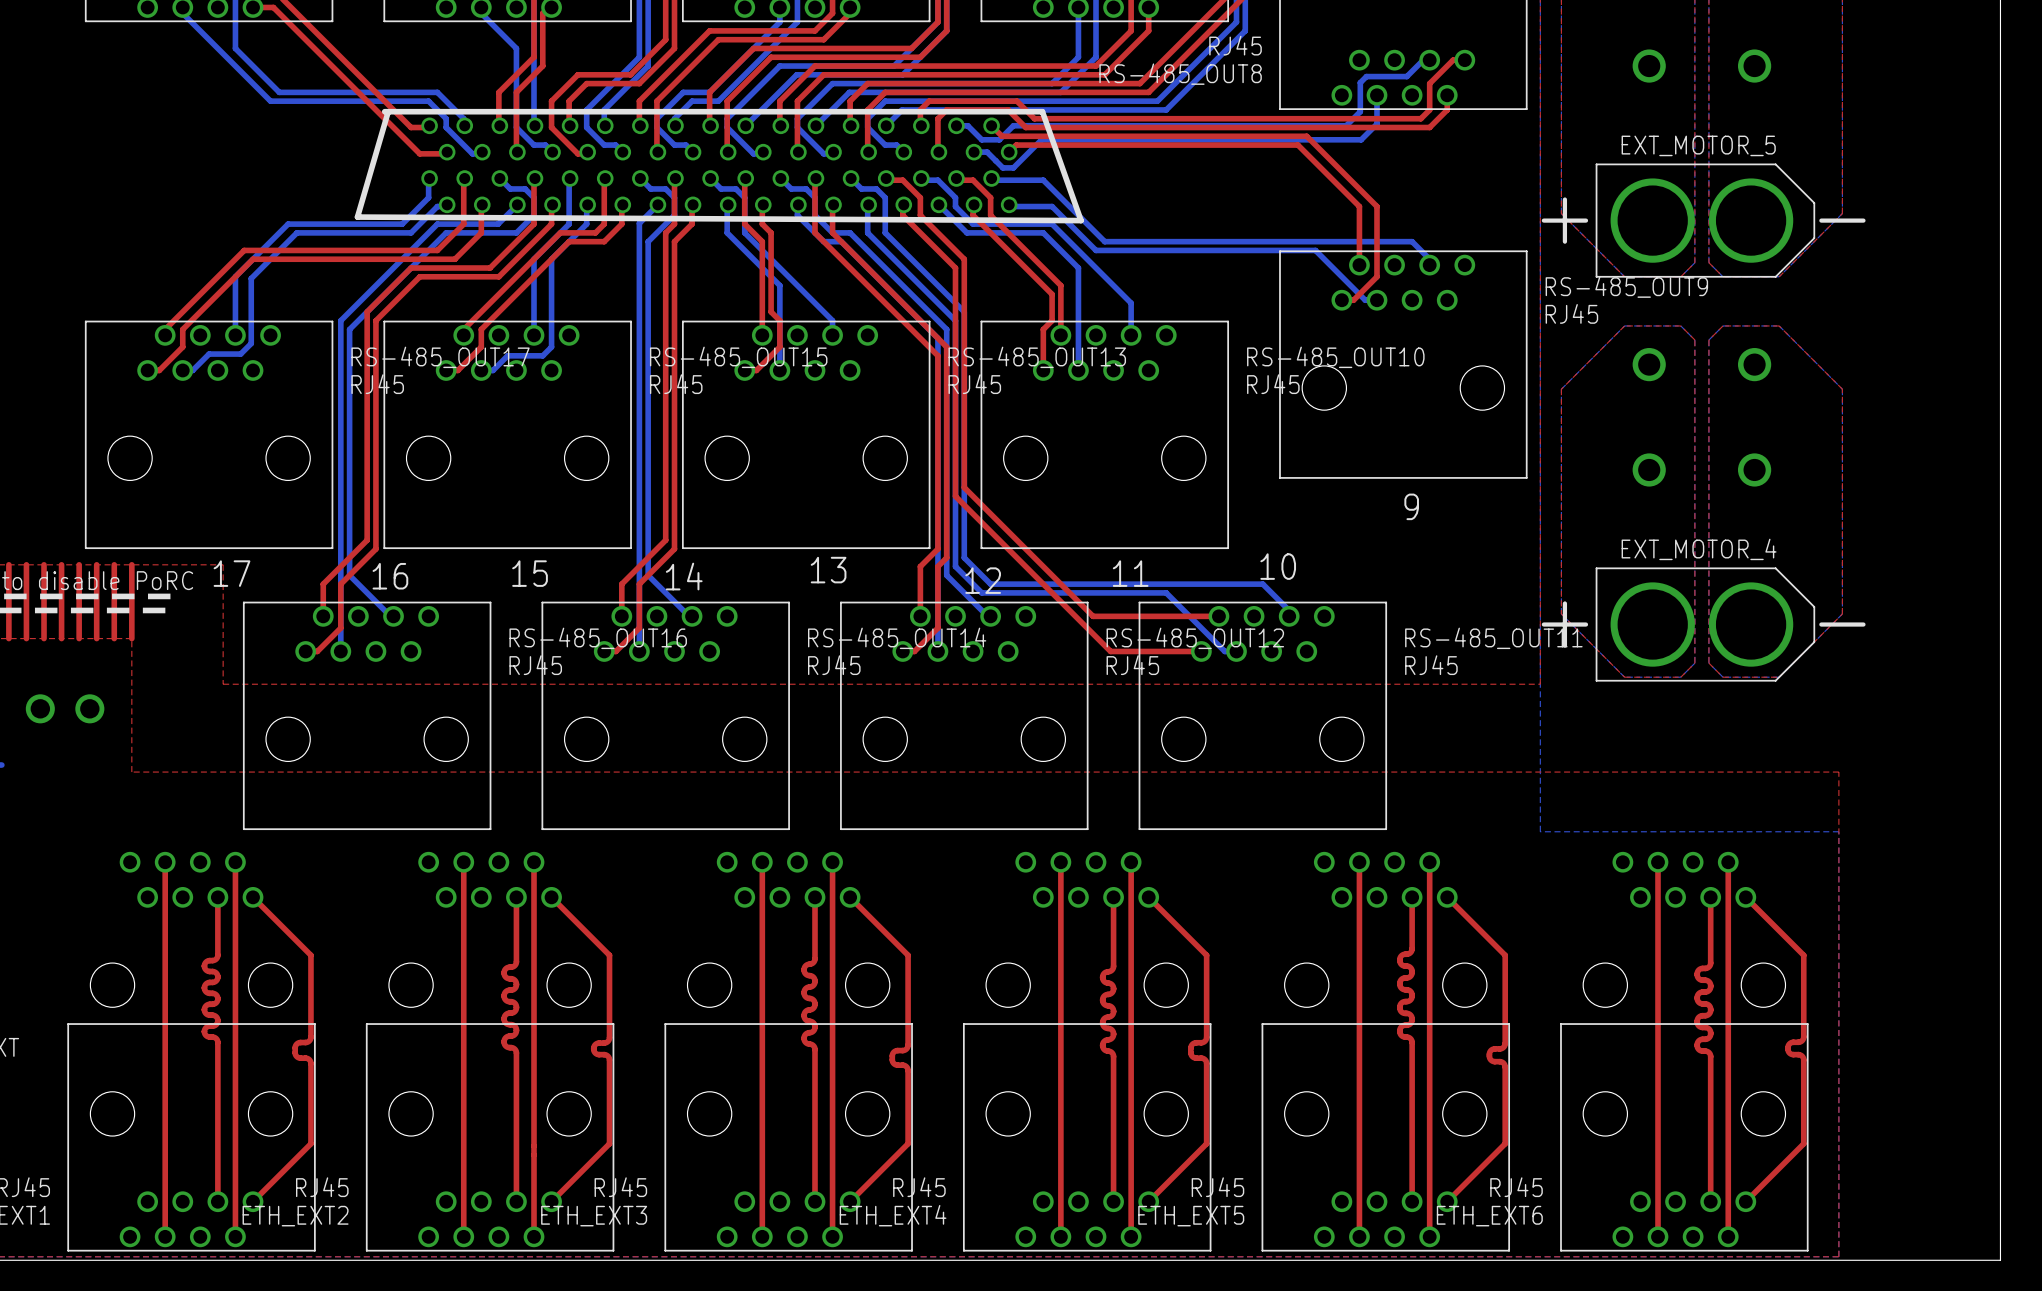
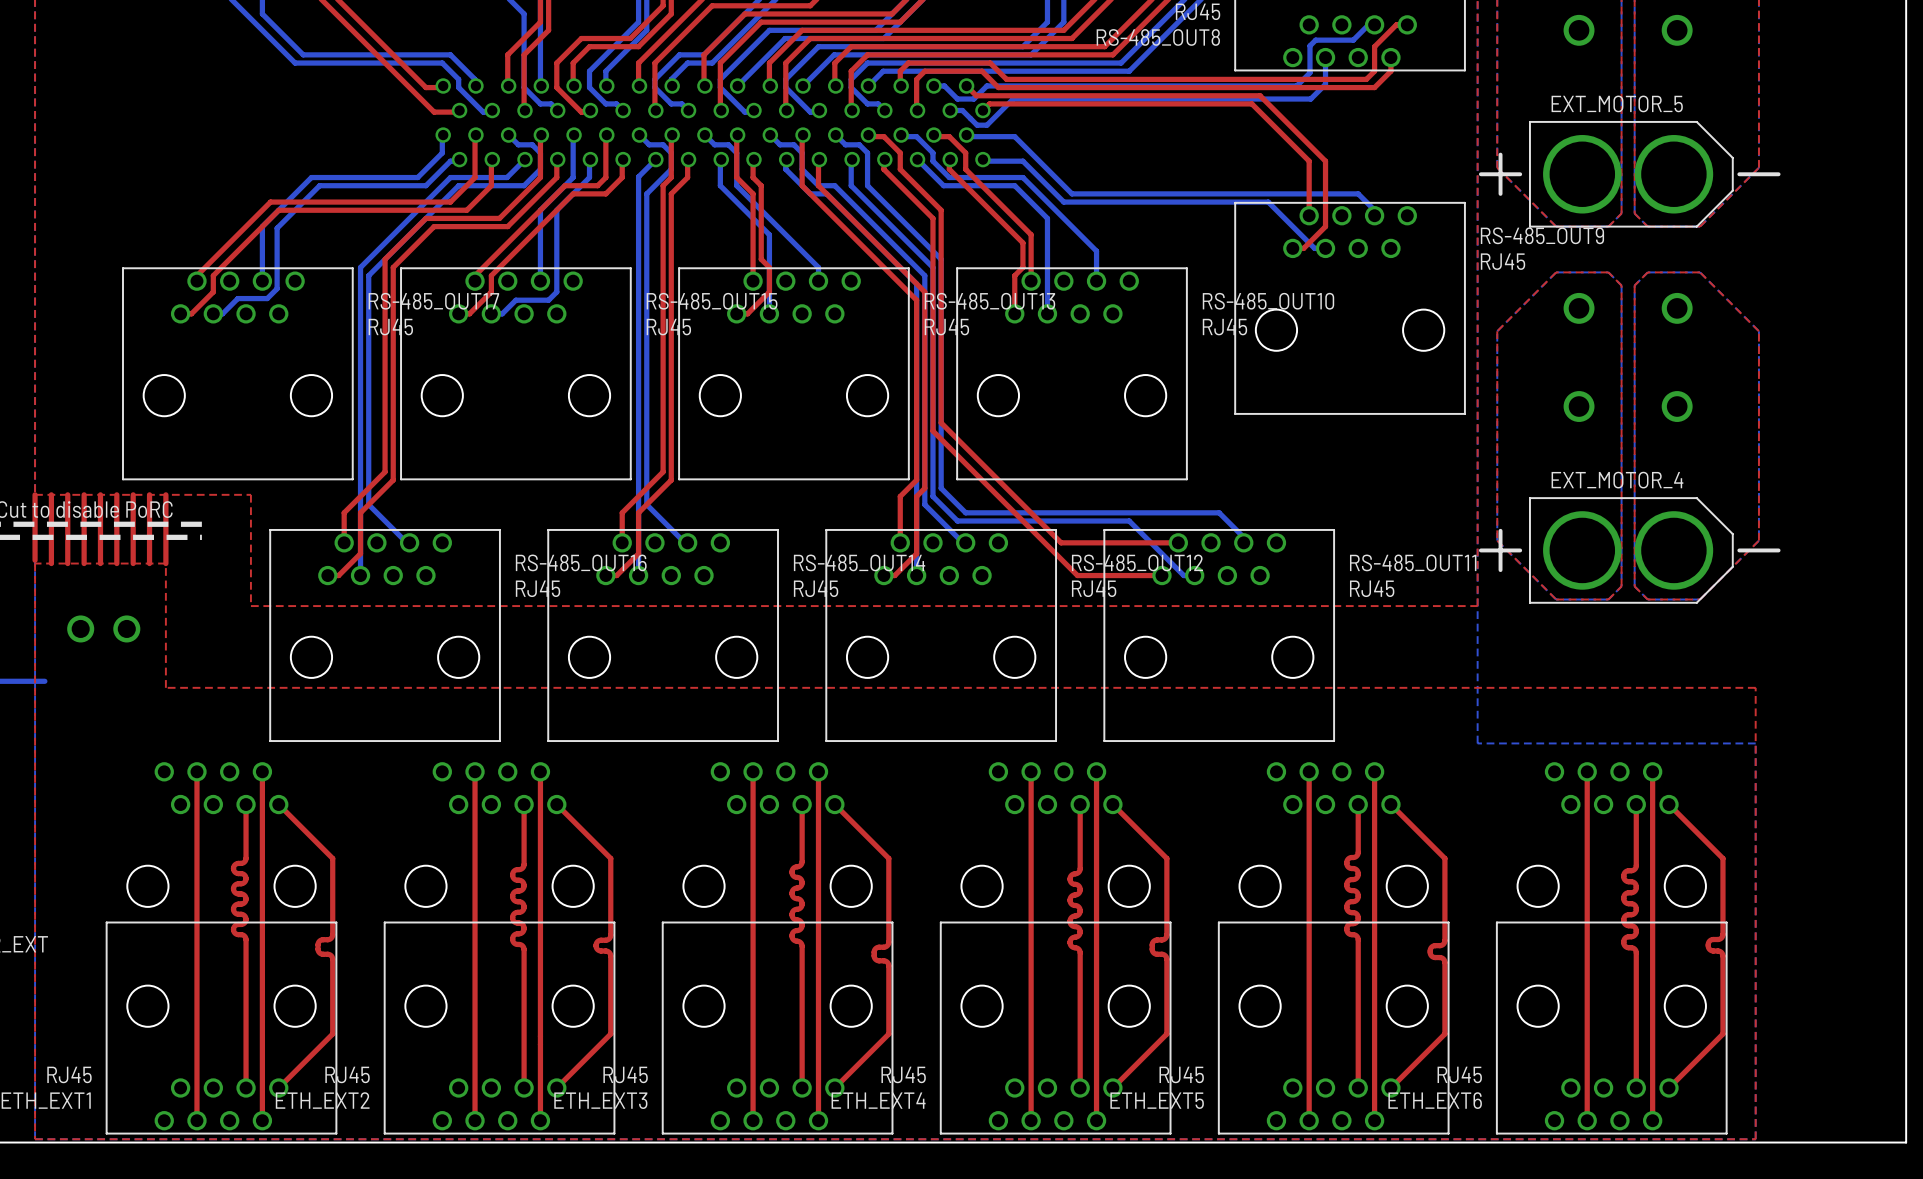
line: (384, 111) (1042, 111) (1081, 220) (357, 217) (388, 111) -> none
text: 9 (1411, 506) -> none
text: 10 (1278, 566) -> none
text: 13 (828, 570) -> none
text: 17 (231, 573) -> none
text: 15 (530, 573) -> none
text: 11 (1130, 573) -> none
text: 16 (390, 576) -> none
text: 14 (684, 576) -> none
text: 12 (983, 580) -> none

